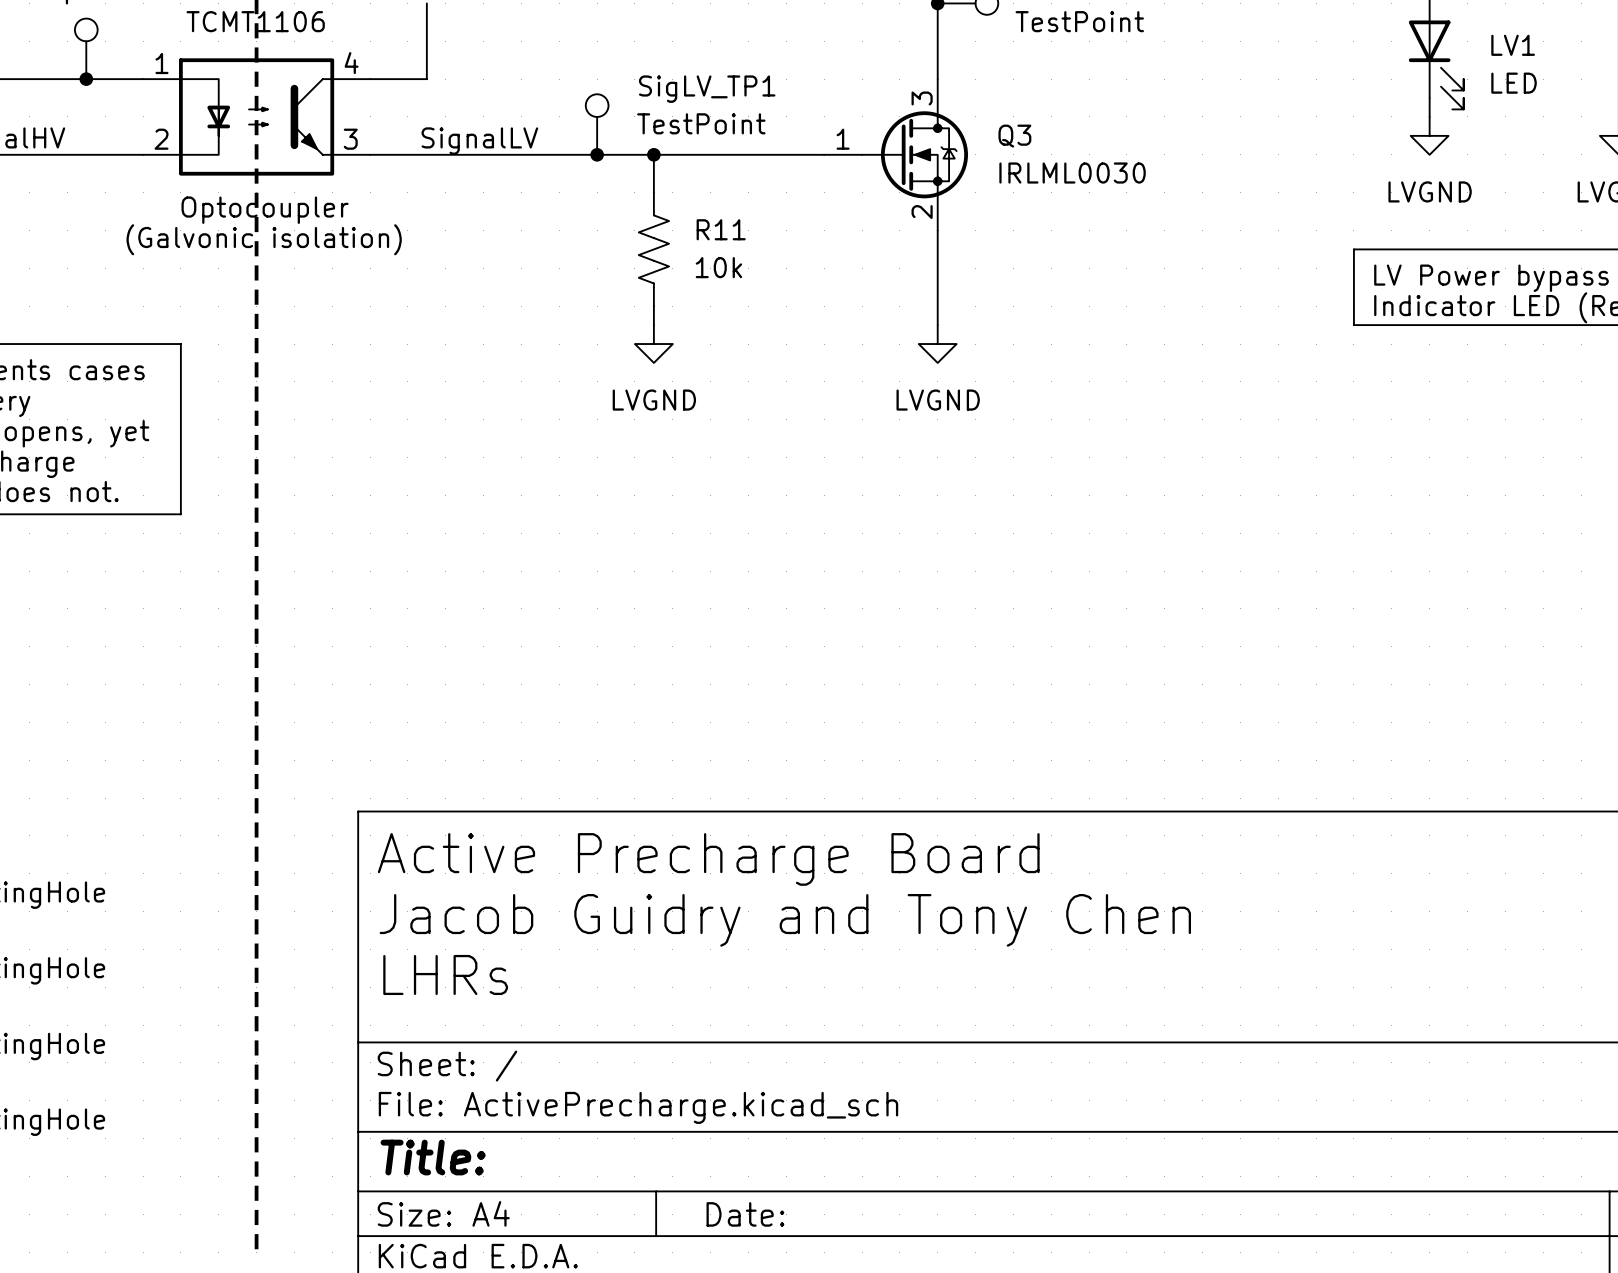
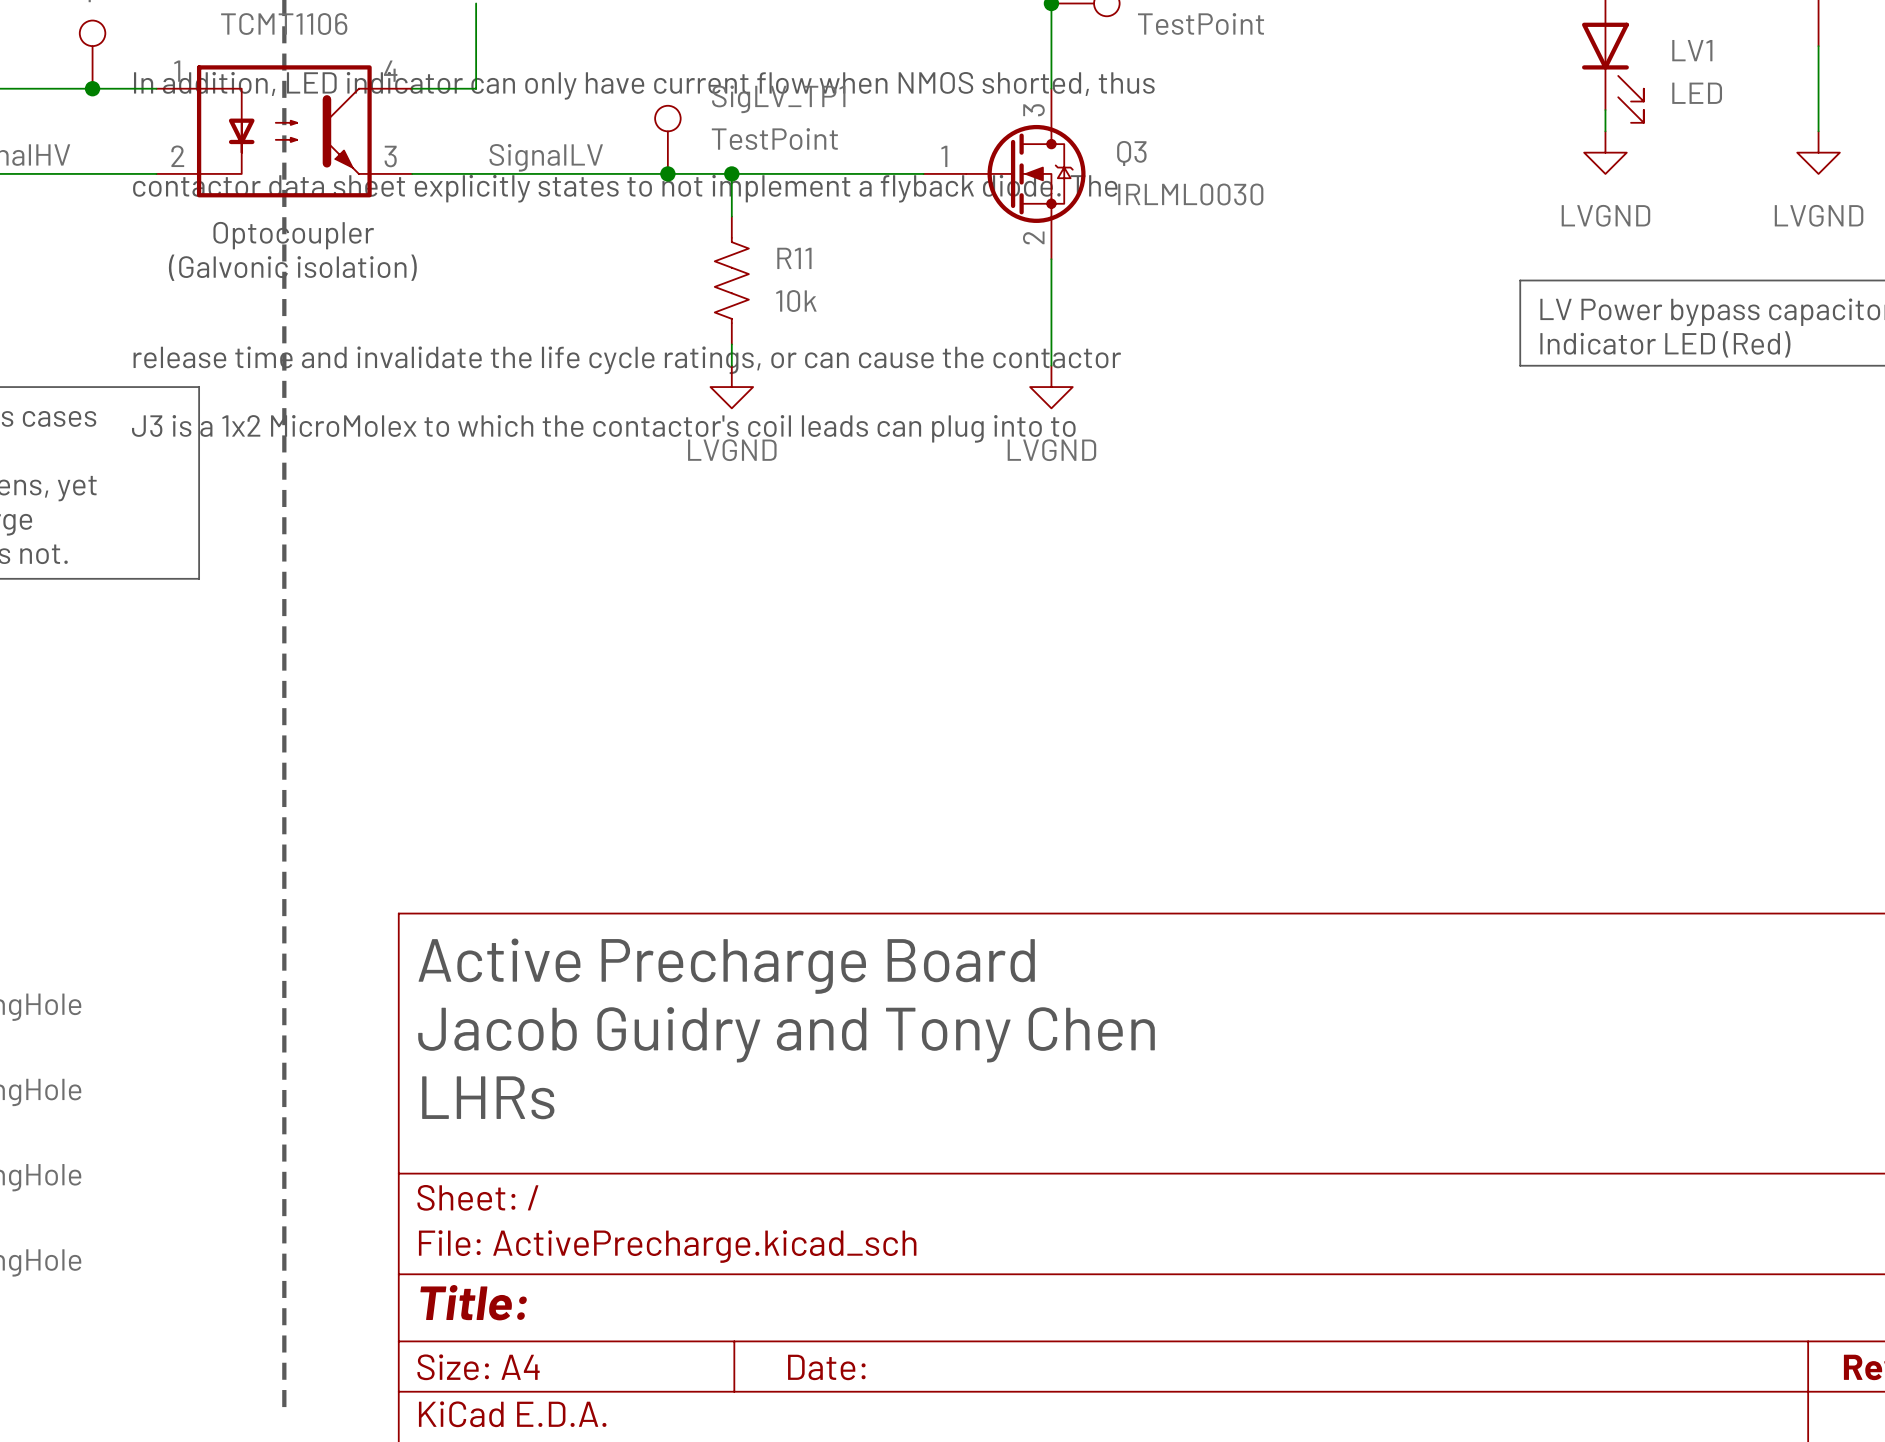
text: none -> In addition, LED indicator can only have current flow when NMOS shorted, thus (644, 85)
text: none -> contactor data sheet explicitly states to not implement a flyback diode. The (625, 188)
text: none -> release time and invalidate the life cycle ratings, or can cause the contactor (627, 360)
text: none -> J3 is a 1x2 MicroMolex to which the contactor's coil leads can plug into to (603, 428)

